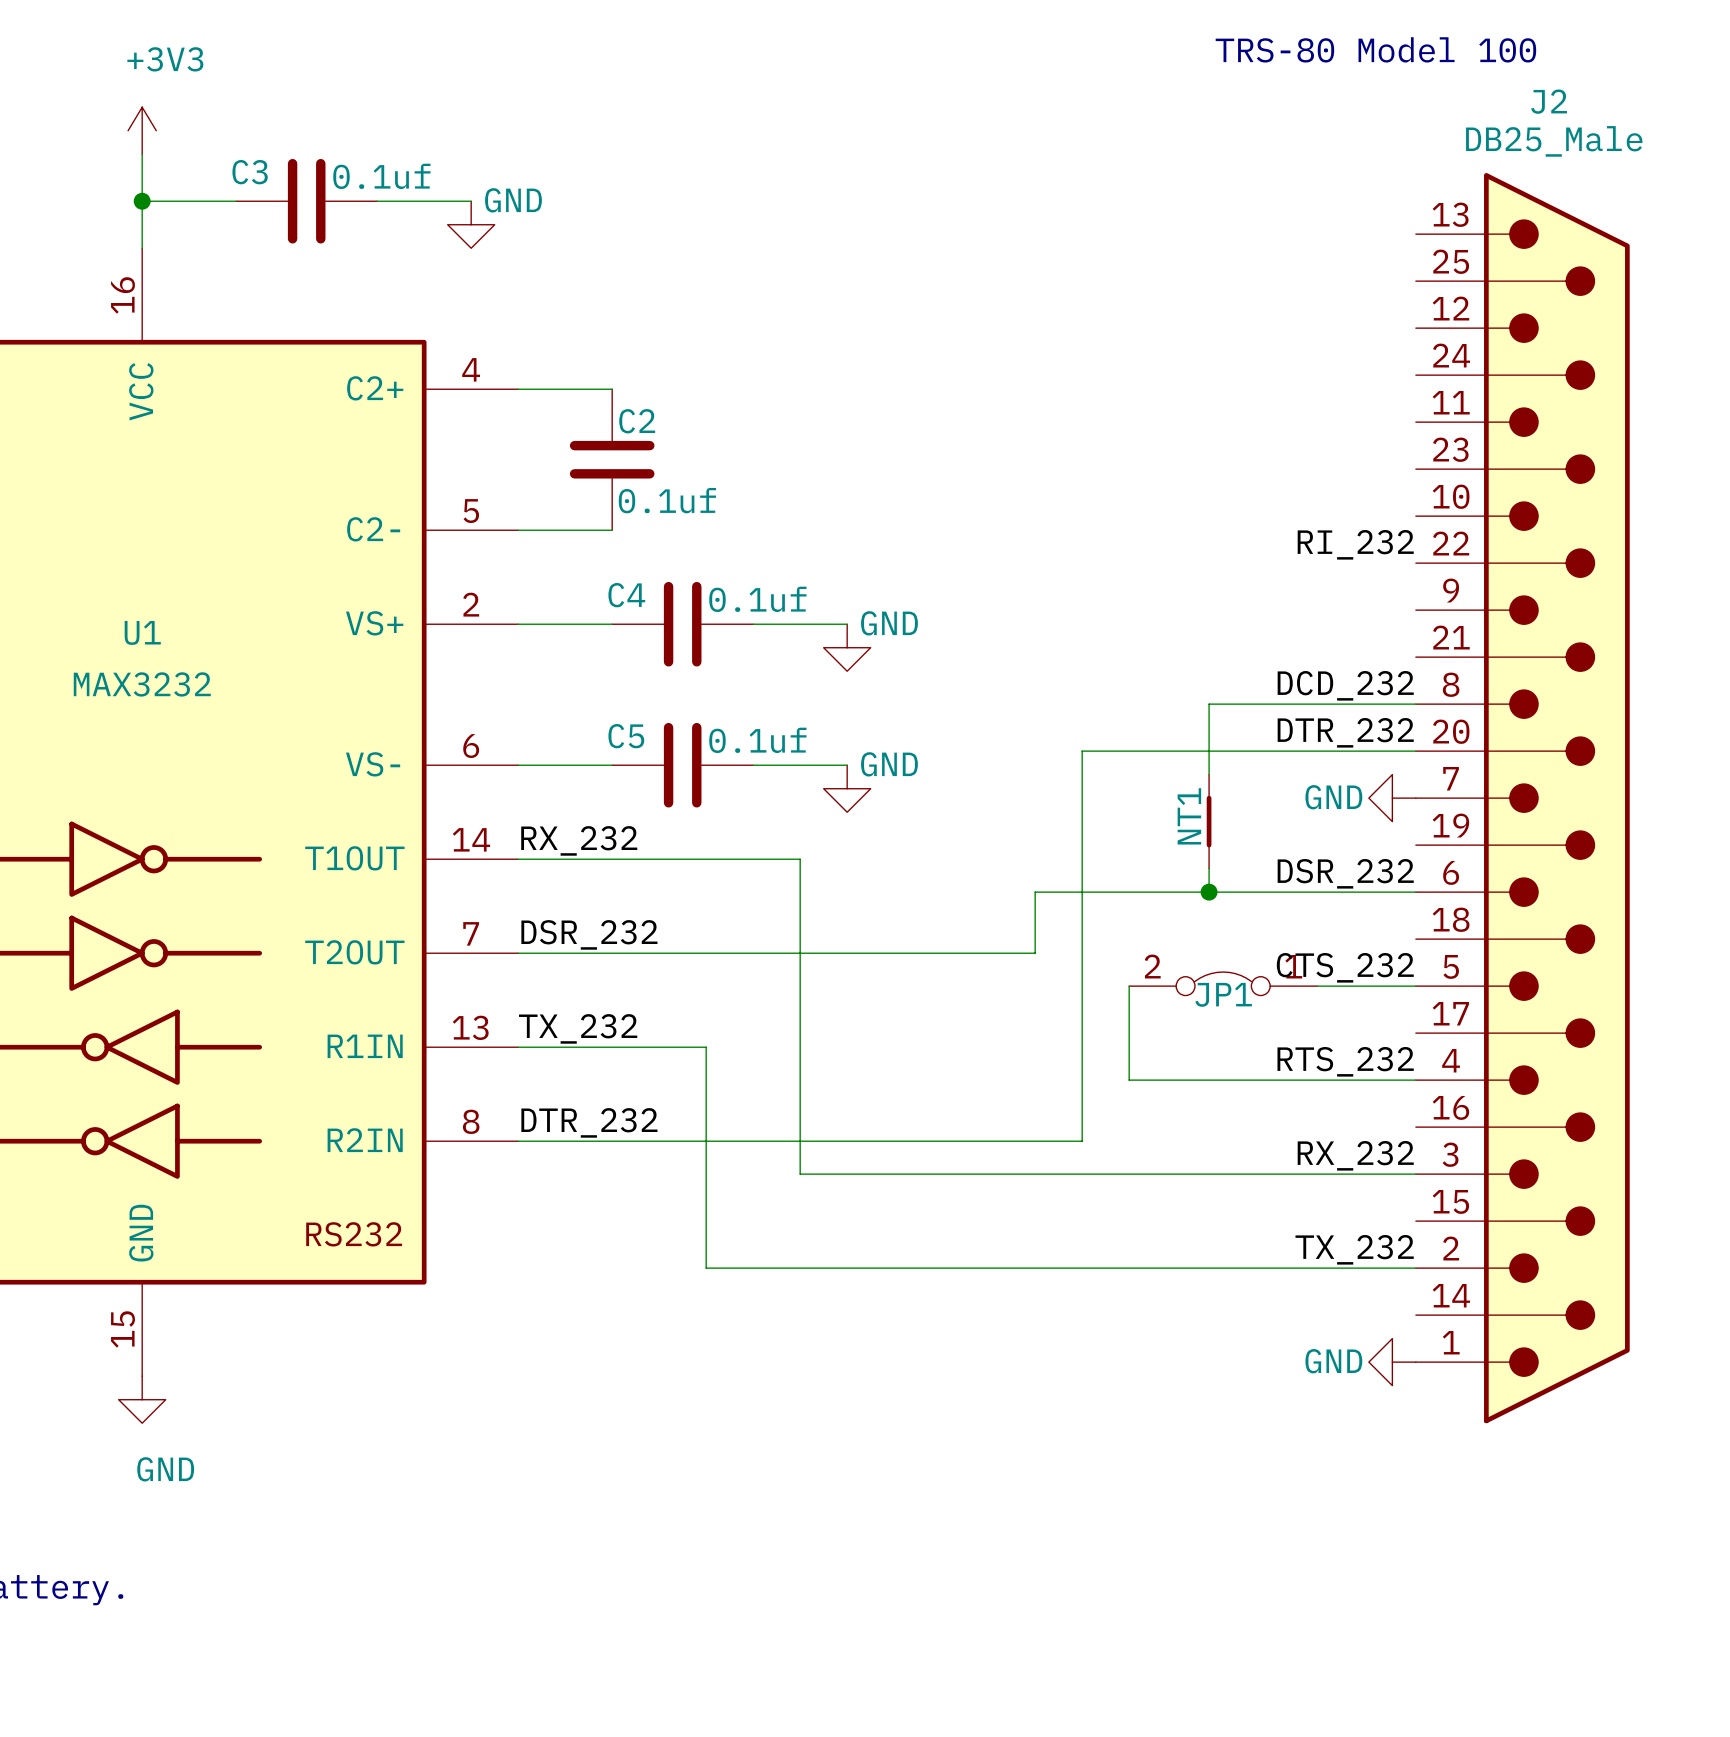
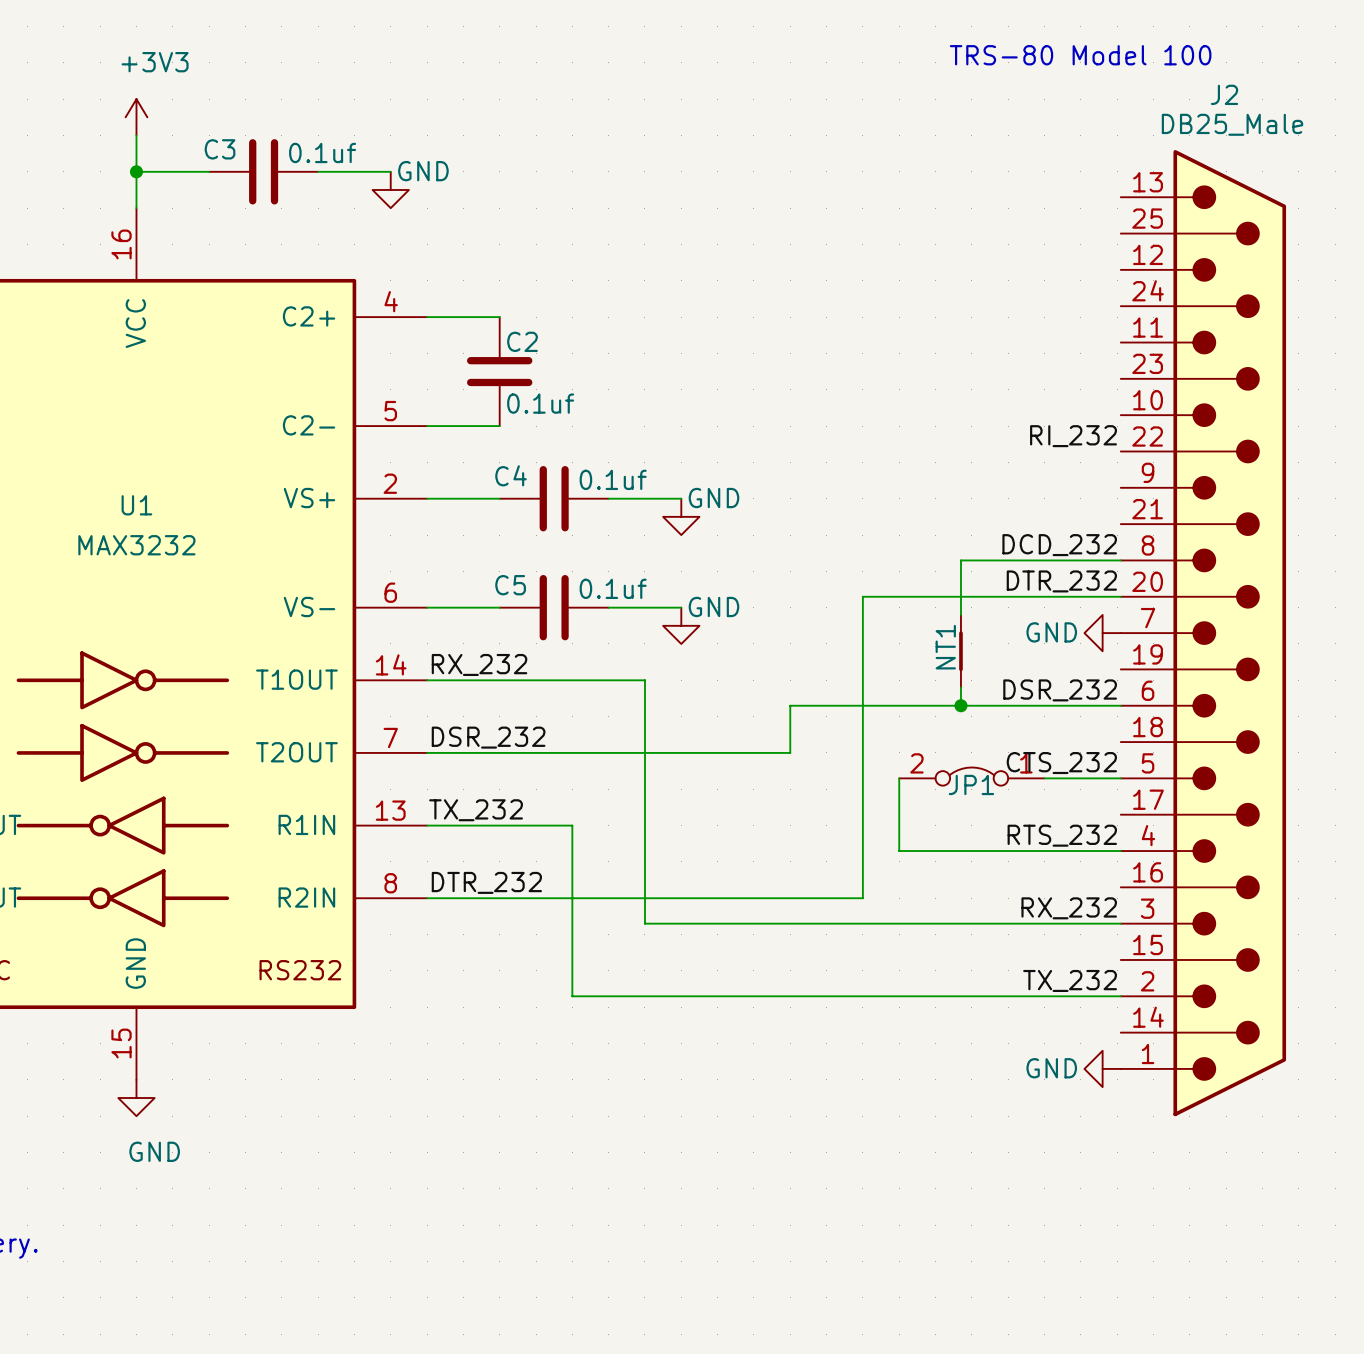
wire: (1035, 892) (1035, 953) (988, 953) -> (826, 705) (790, 705) (790, 752)

